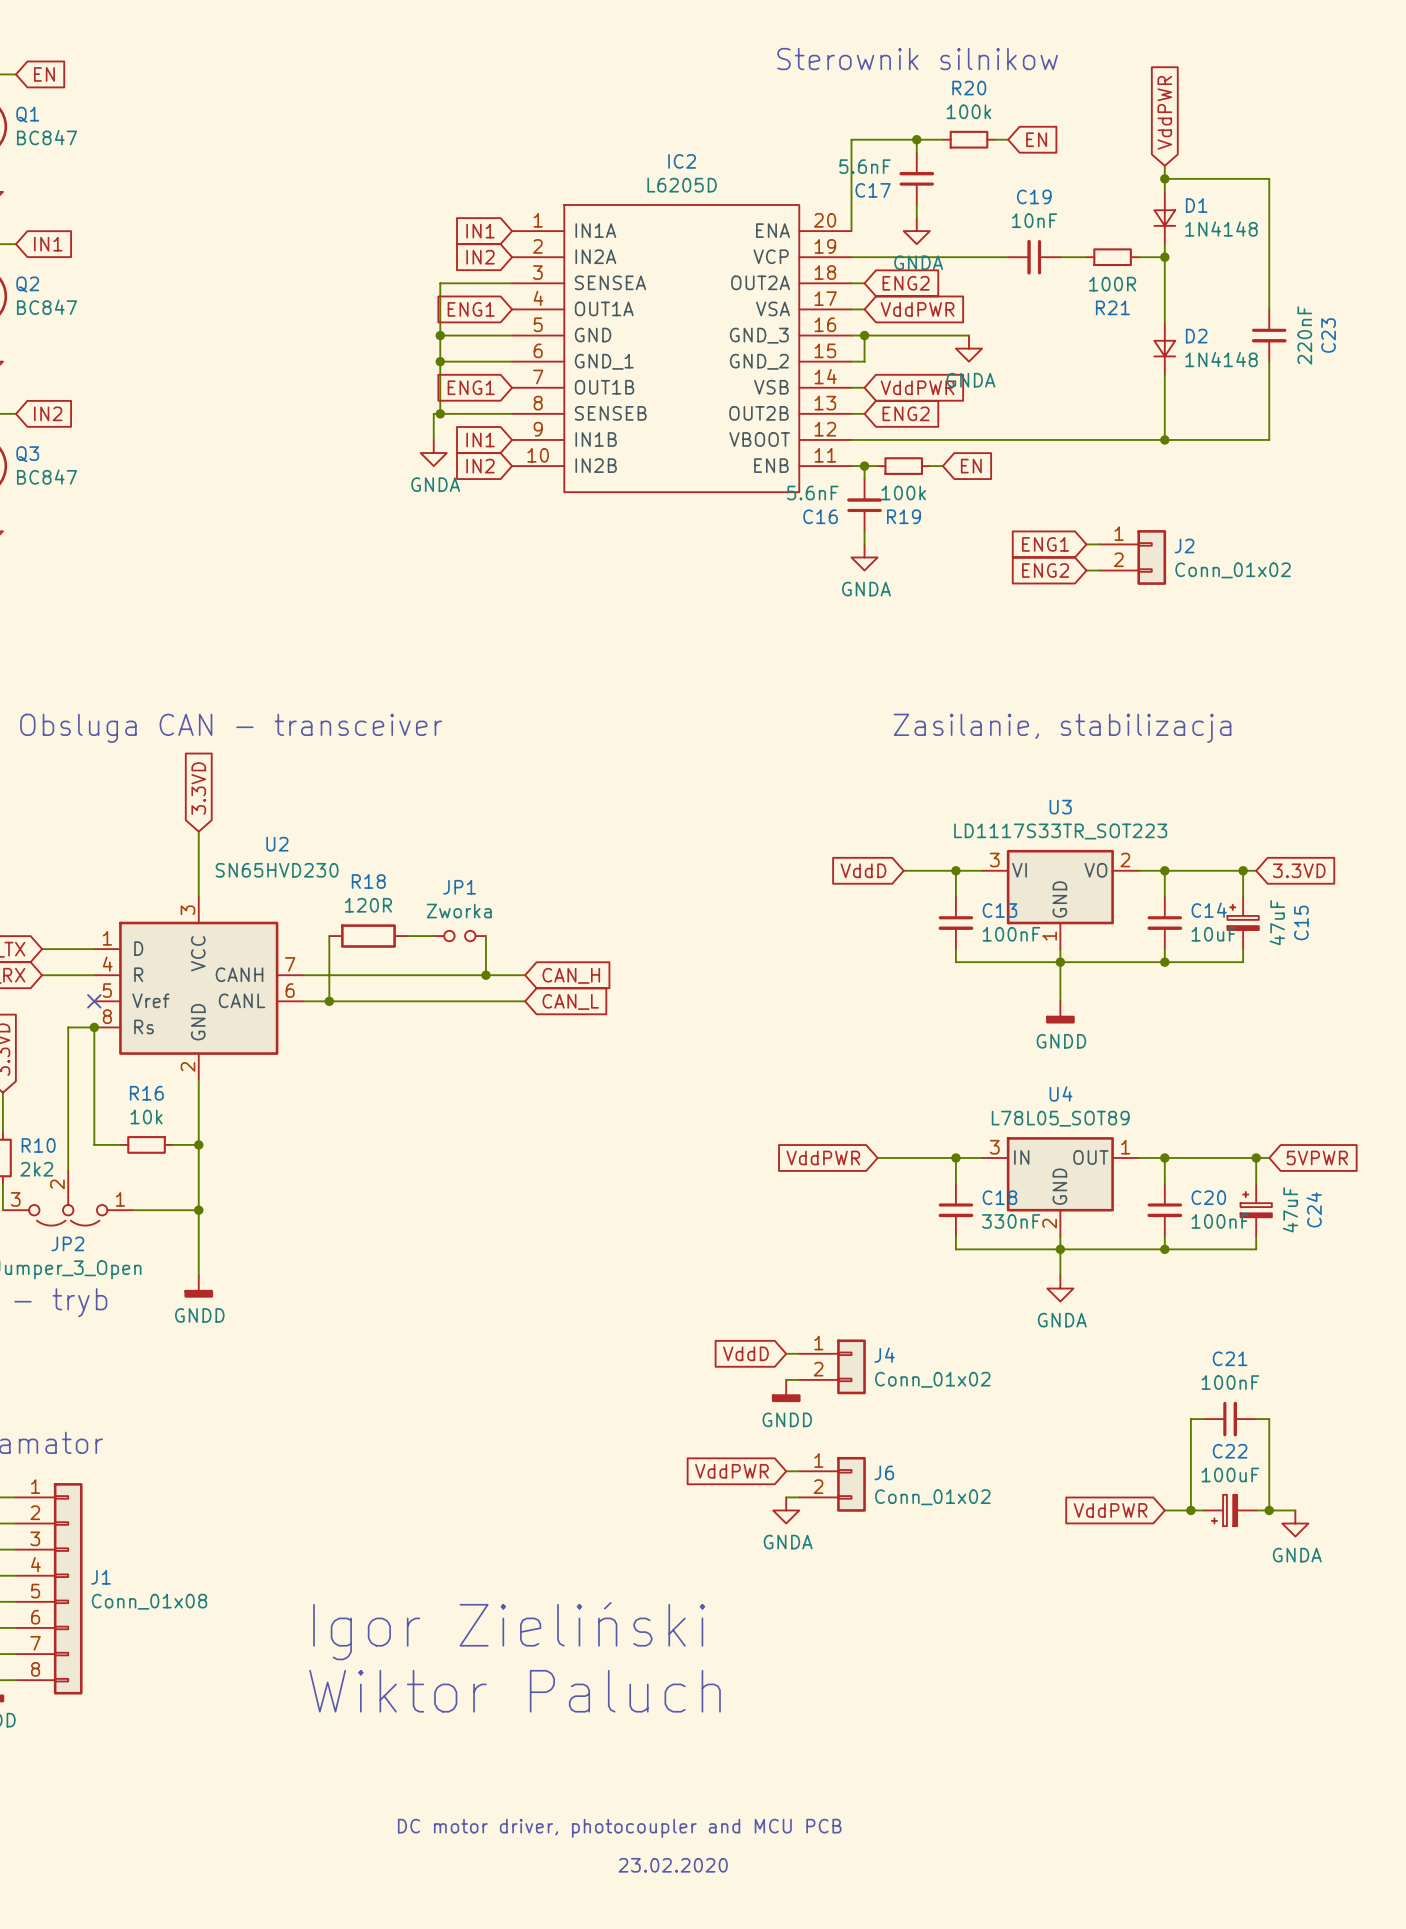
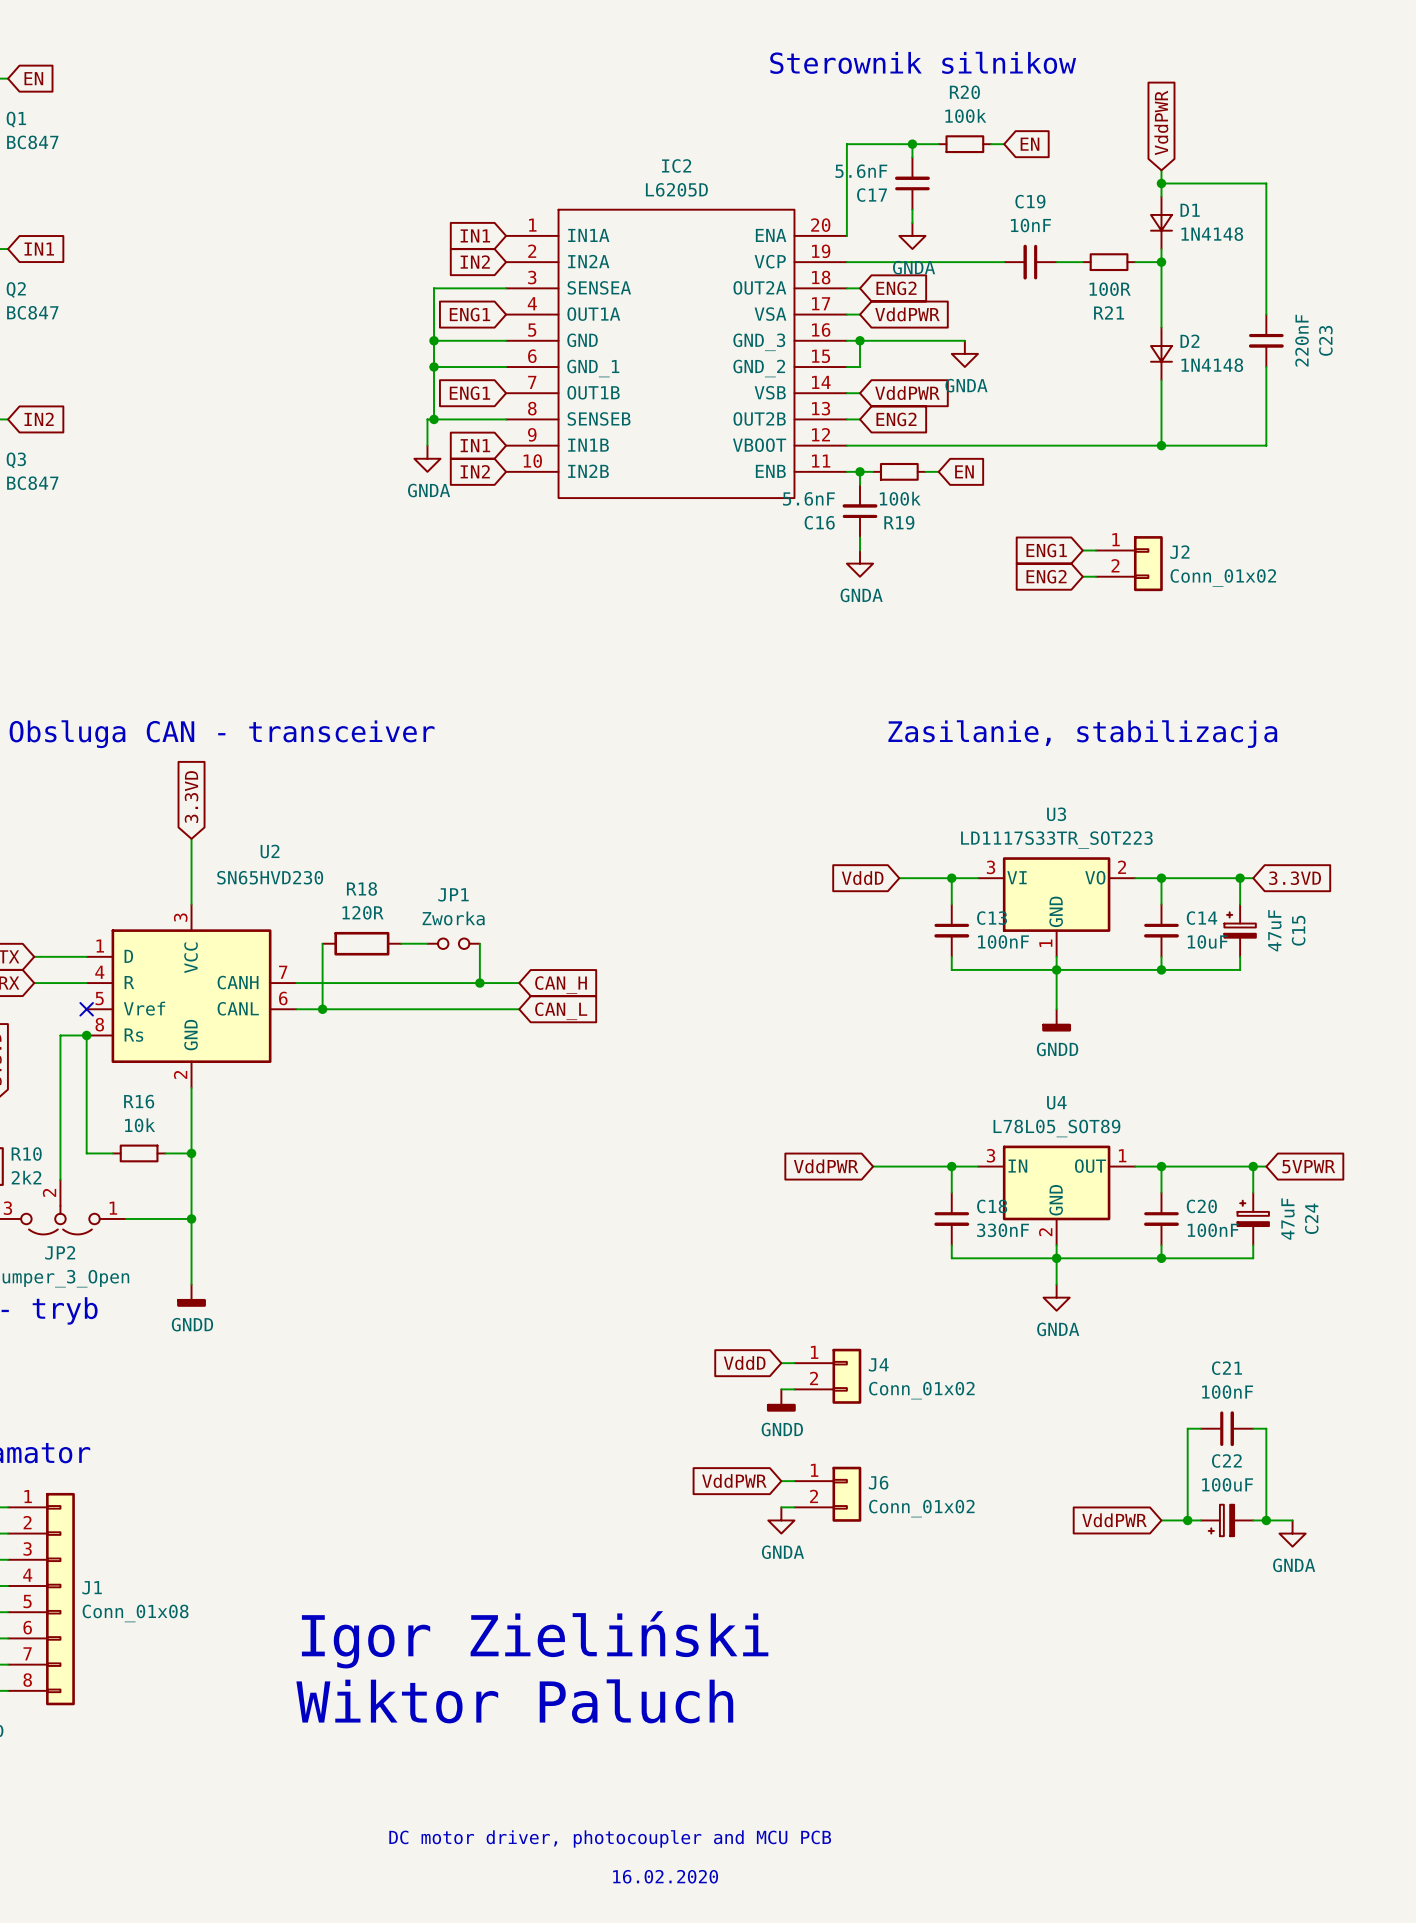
text: 23.02.2020 (673, 1865) -> 16.02.2020 (665, 1876)

